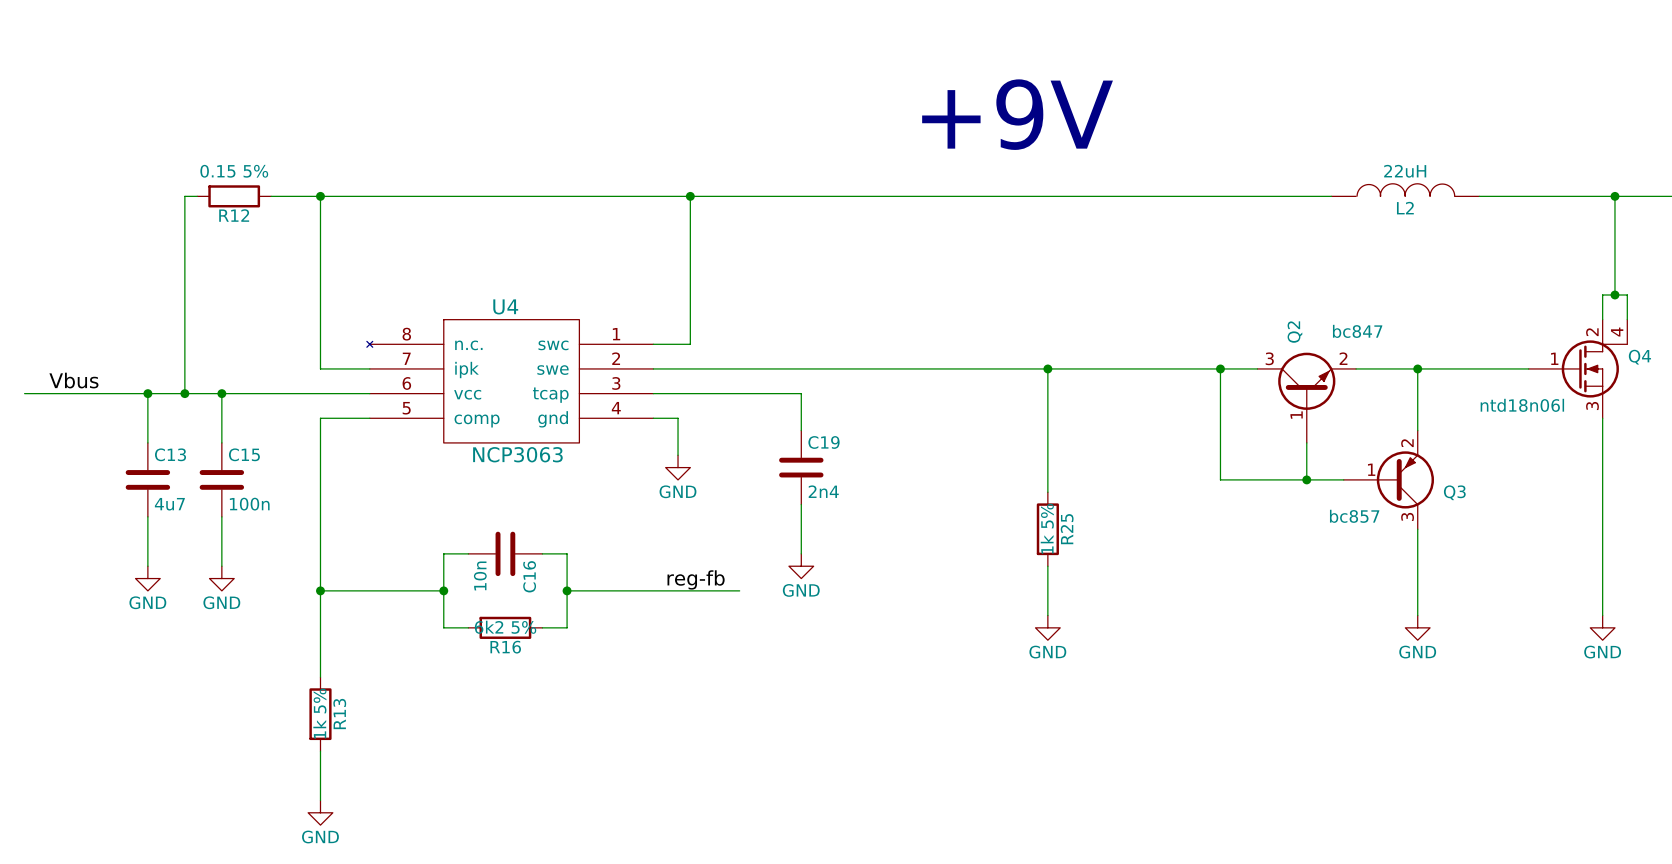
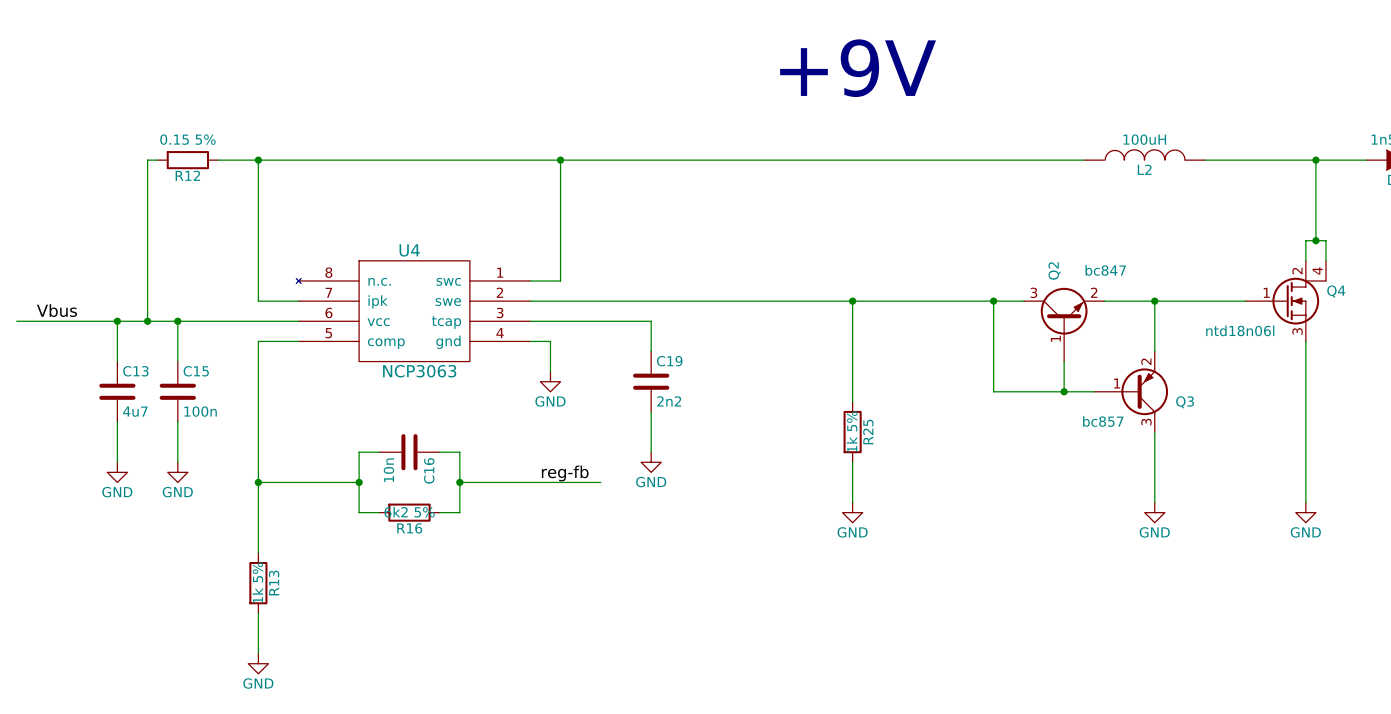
text position: +9V (1017, 114) -> +9V (858, 68)
L2 value: 22uH (1405, 171) -> 100uH (1144, 139)
C19 value: 2n4 (823, 491) -> 2n2 (669, 401)

